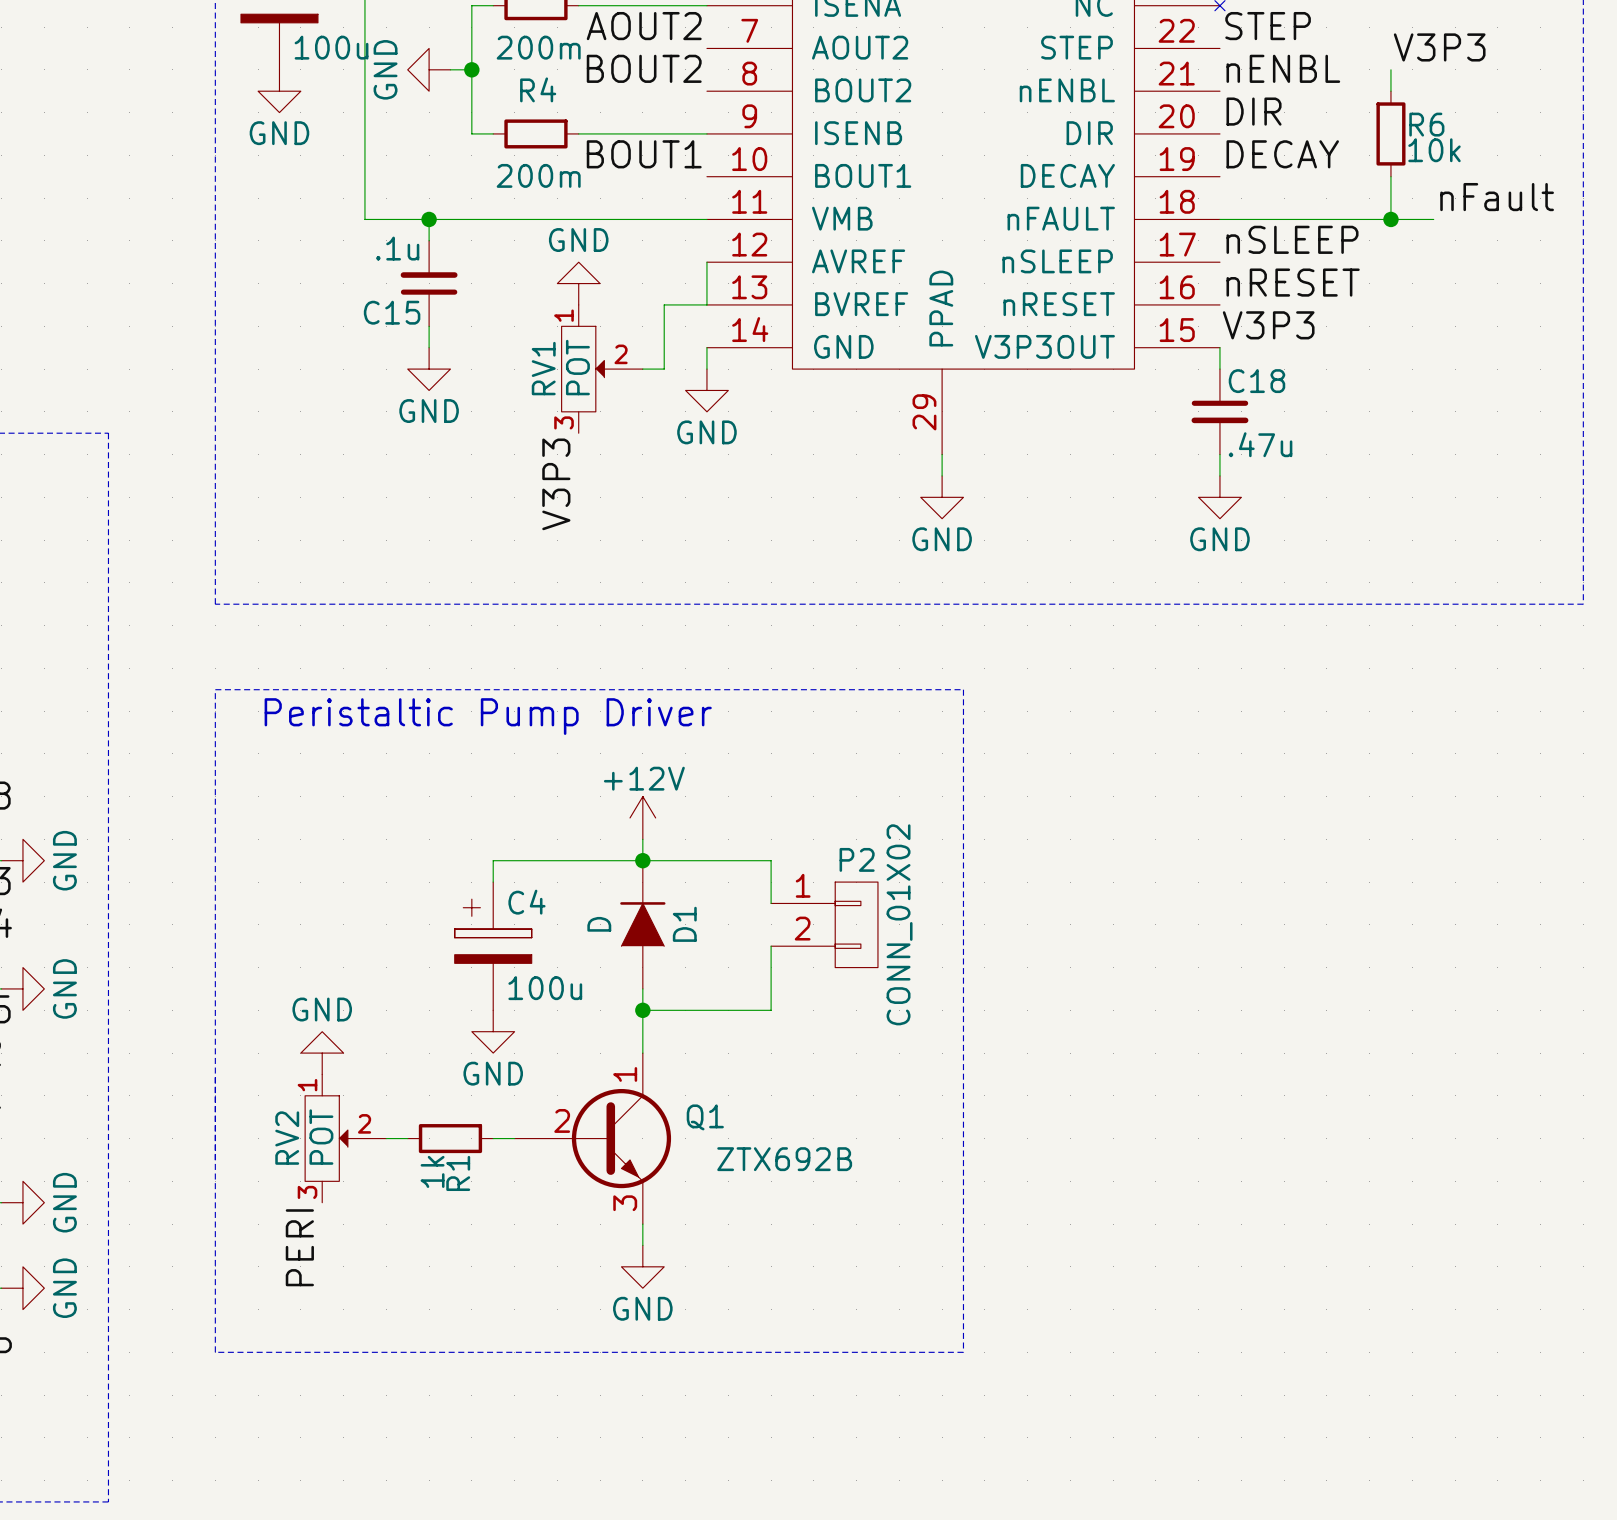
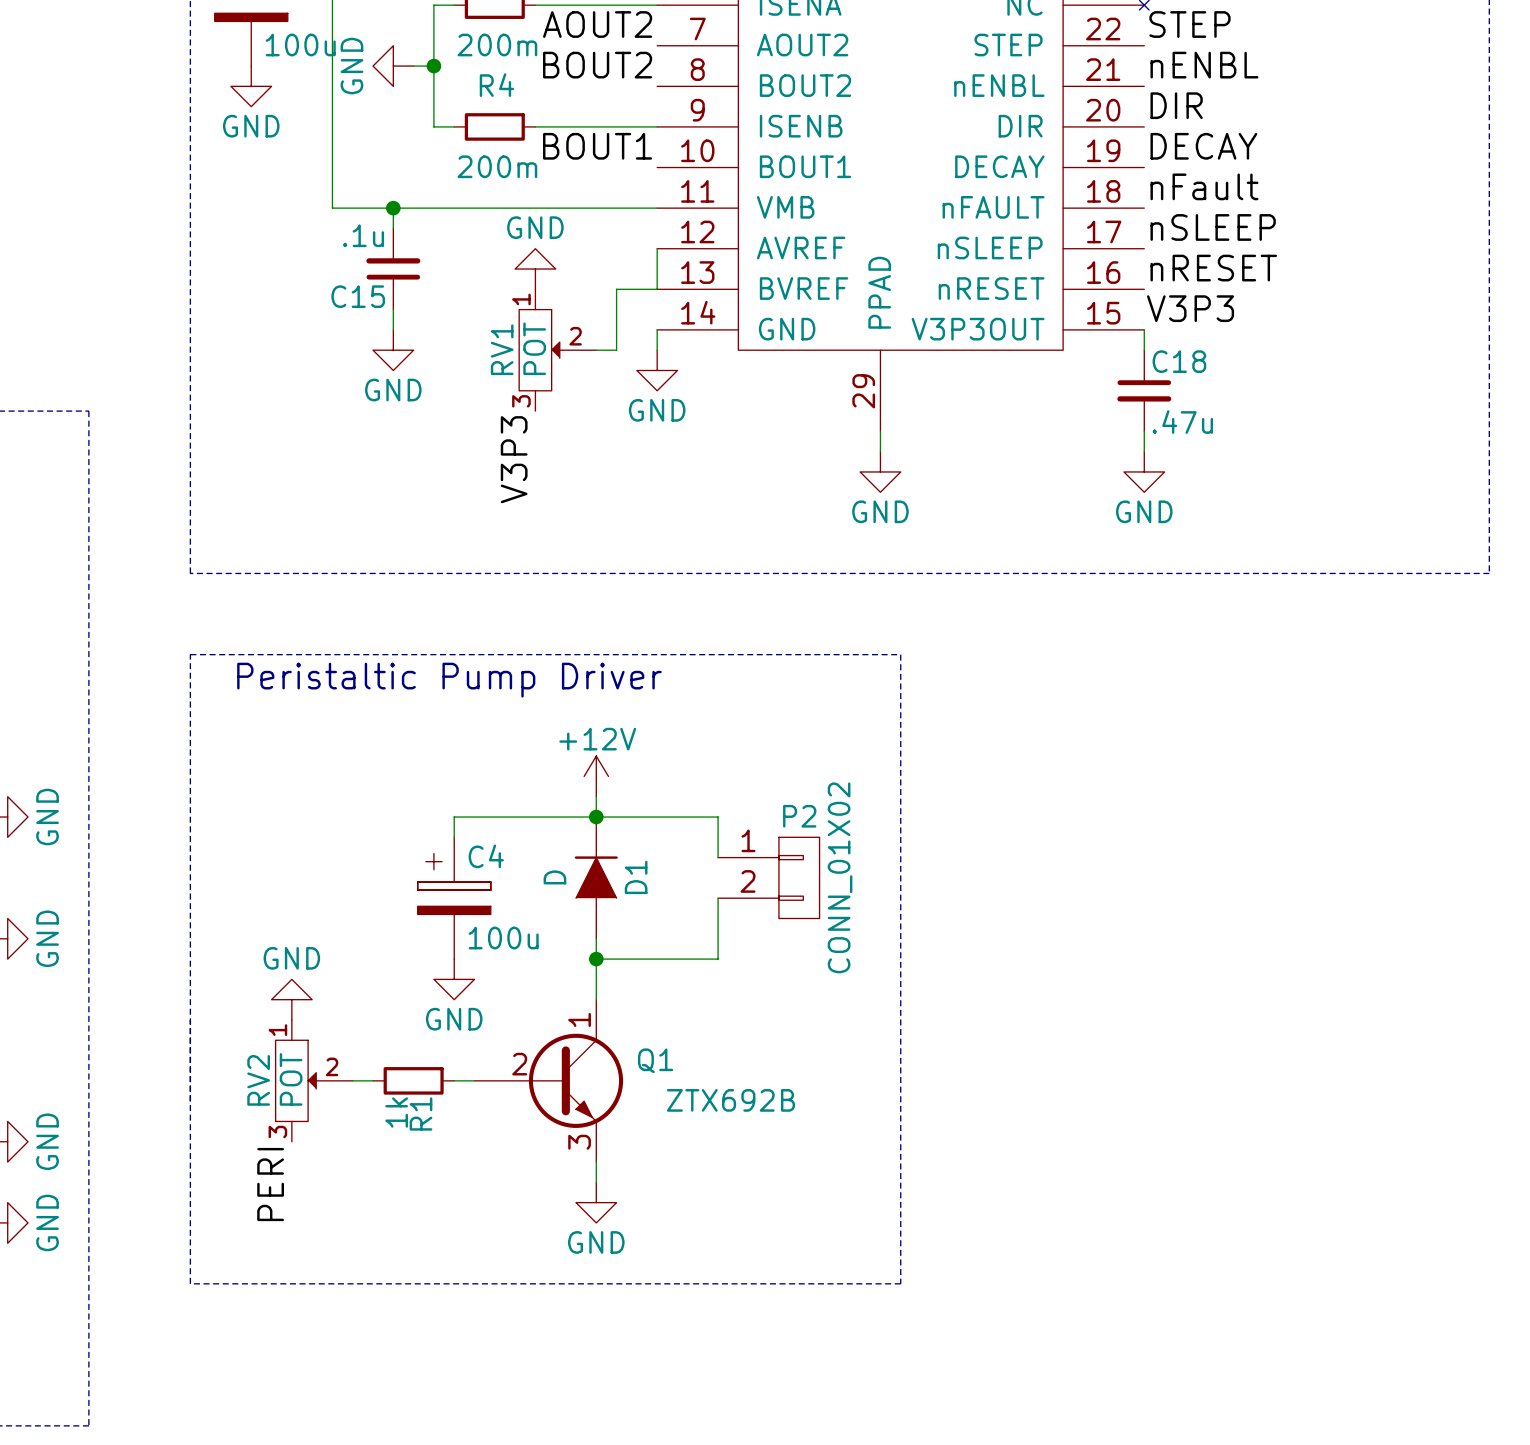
label: V3P3 (1439, 47) -> none
wire: (1390, 69) (1390, 91) -> none
R6: 10k (1390, 133) -> none
wire: (1390, 176) (1390, 219) -> none
label position: nFault (1497, 197) -> nFault (1204, 186)
wire: (1219, 219) (1433, 219) -> none
junction: (1390, 219) -> none

